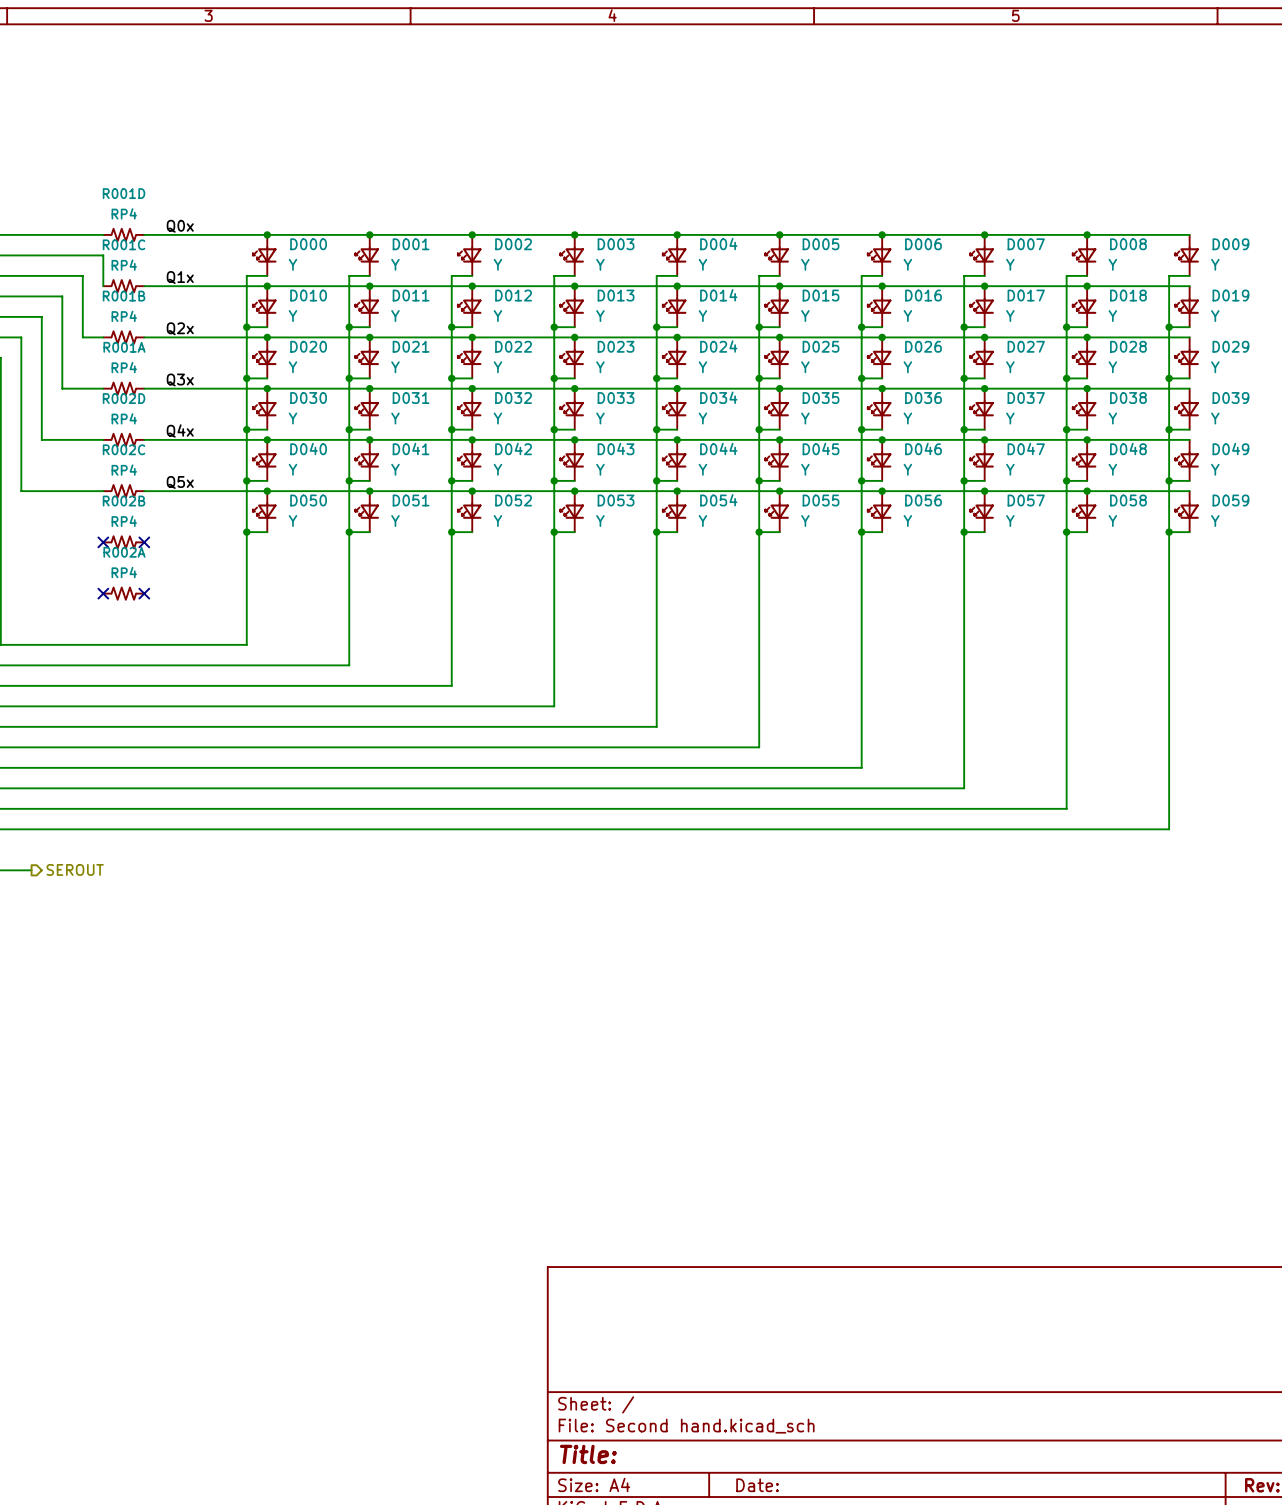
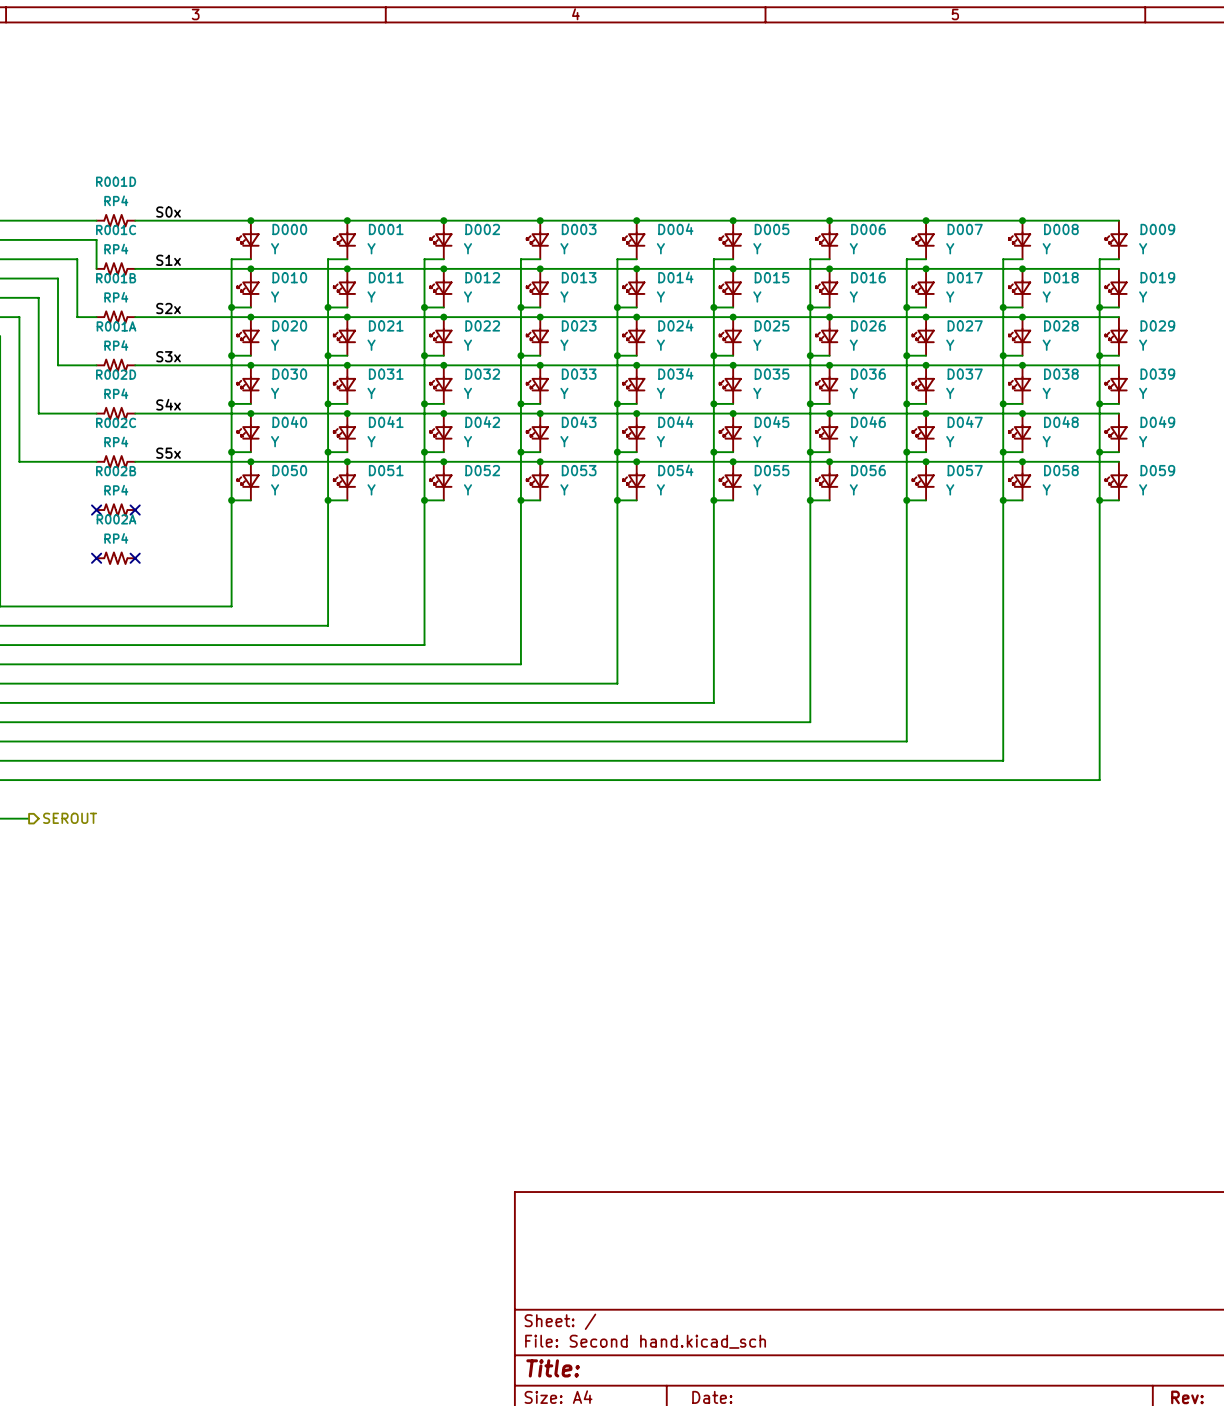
label: Q0x (180, 226) -> S0x (168, 212)
label: Q1x (180, 277) -> S1x (168, 260)
label: Q2x (180, 328) -> S2x (168, 308)
label: Q3x (180, 380) -> S3x (168, 356)
label: Q4x (180, 431) -> S4x (168, 404)
label: Q5x (180, 482) -> S5x (168, 453)

